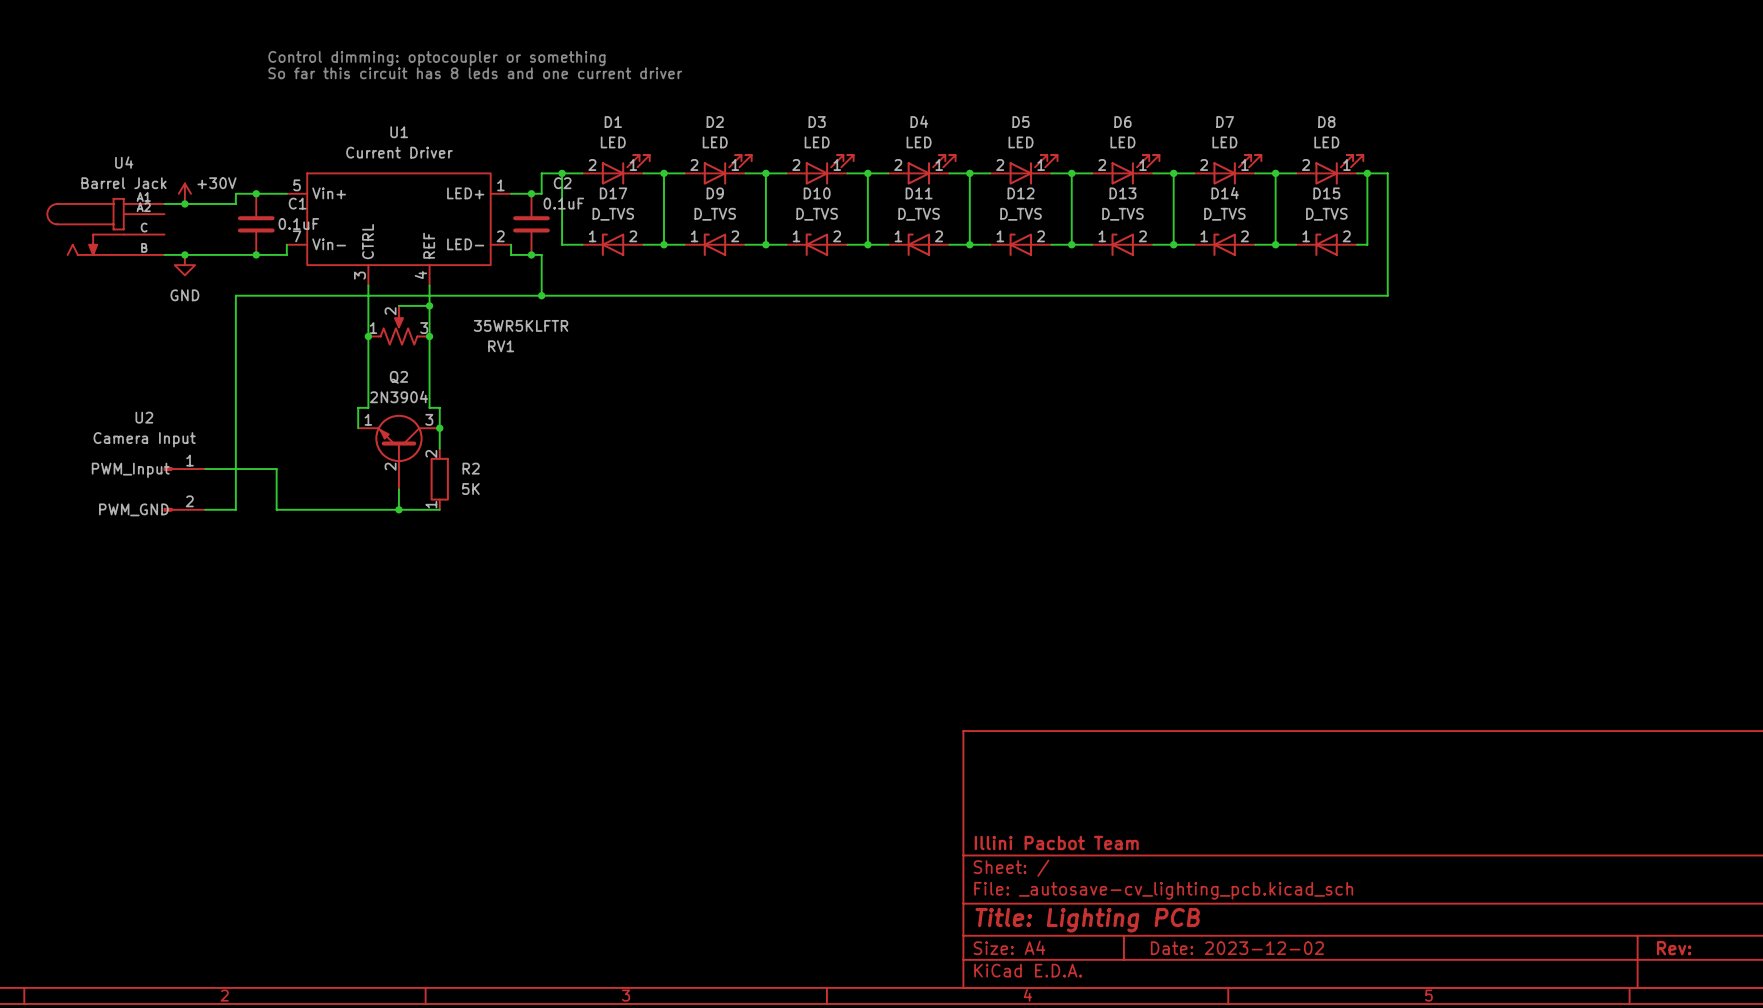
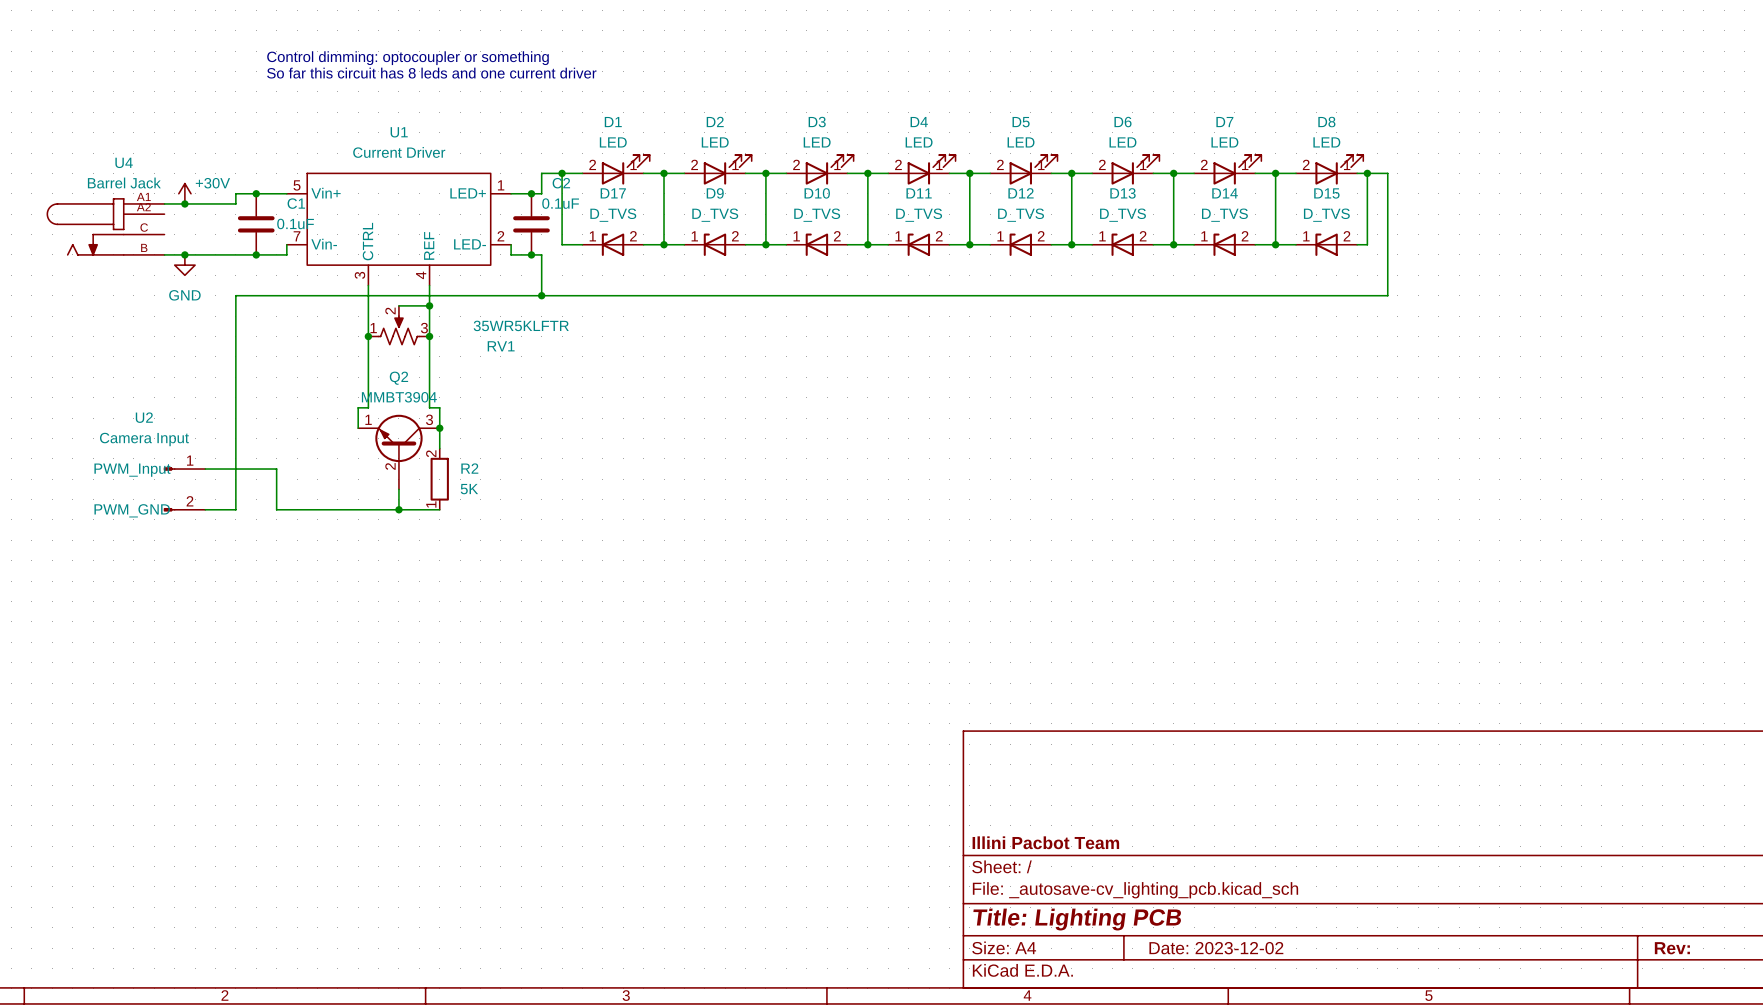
Q2 value: 2N3904 (398, 397) -> MMBT3904 (399, 397)

